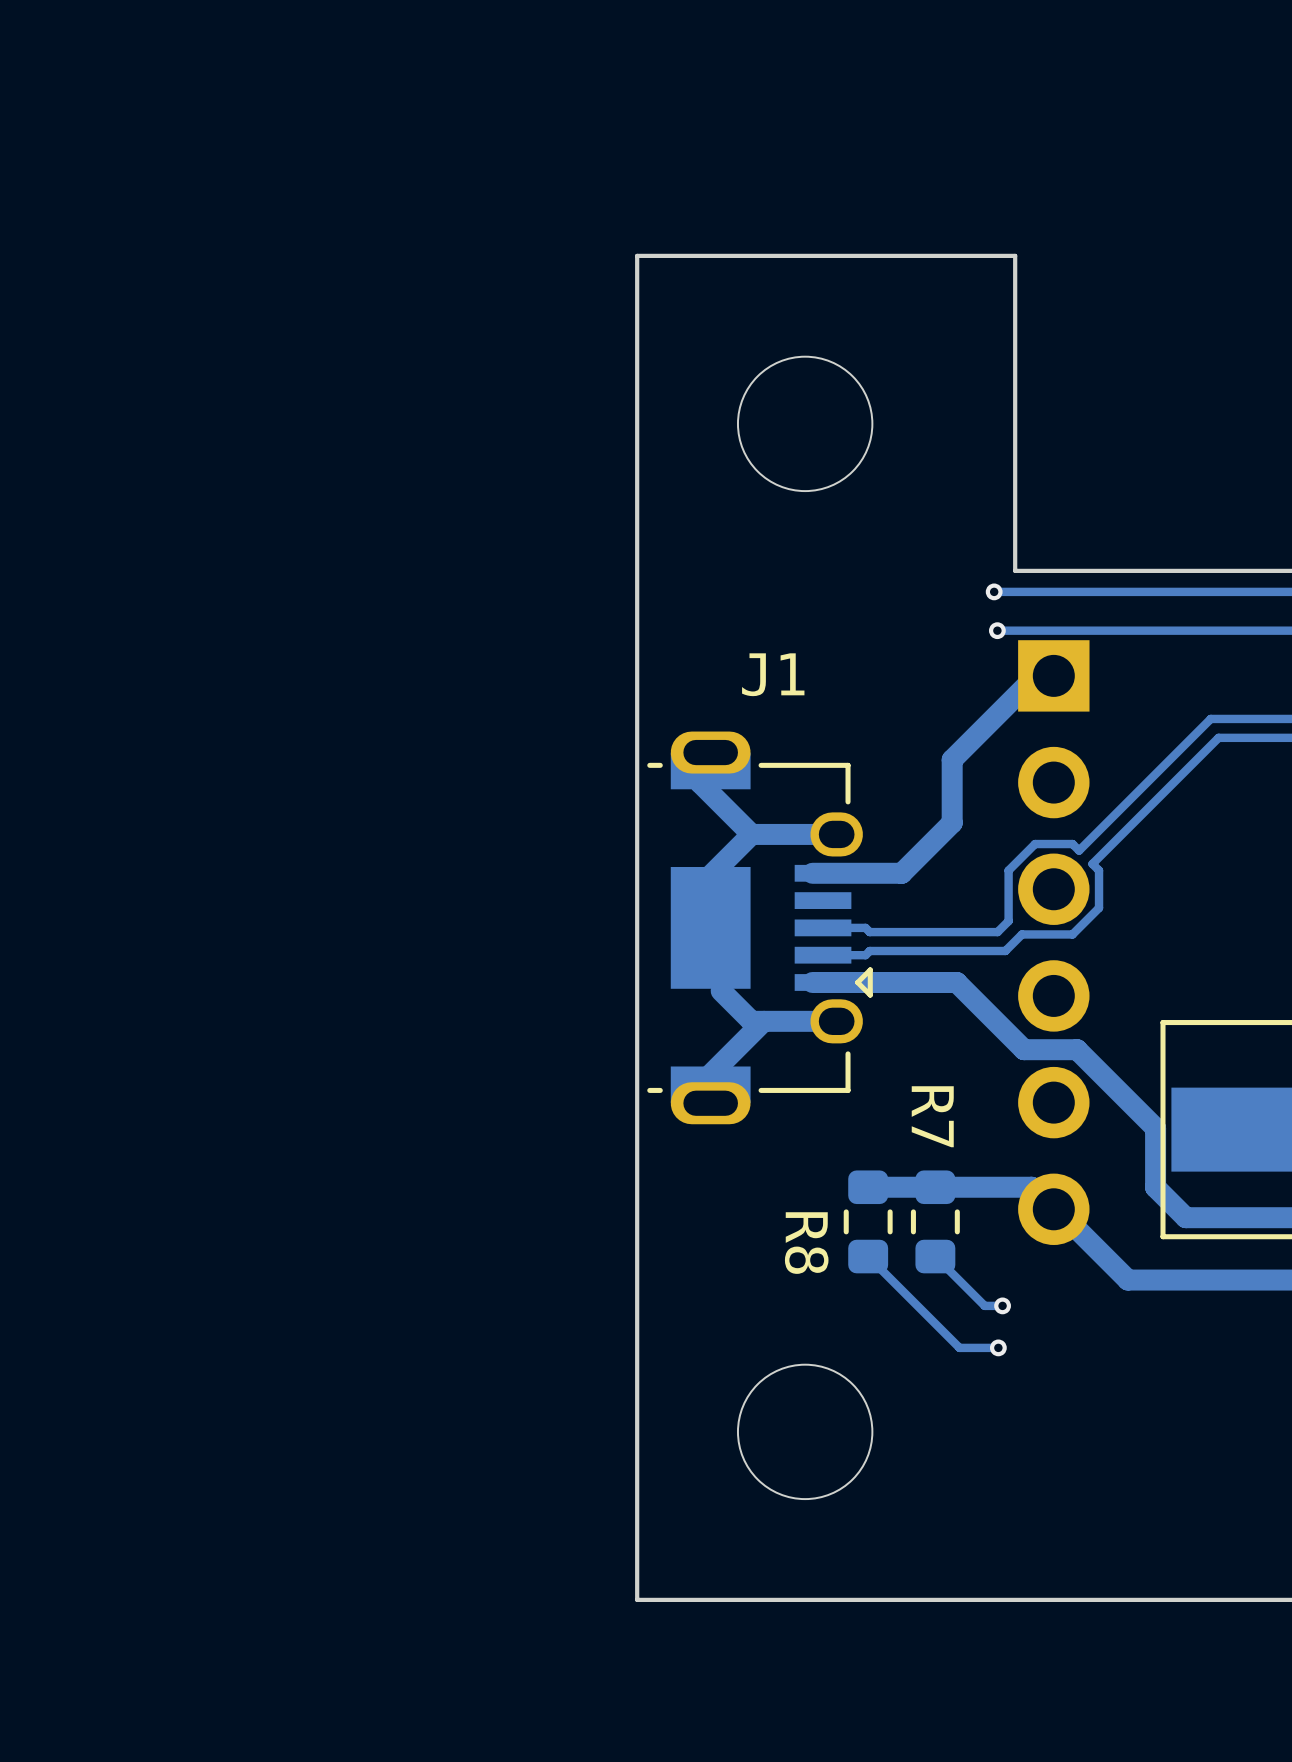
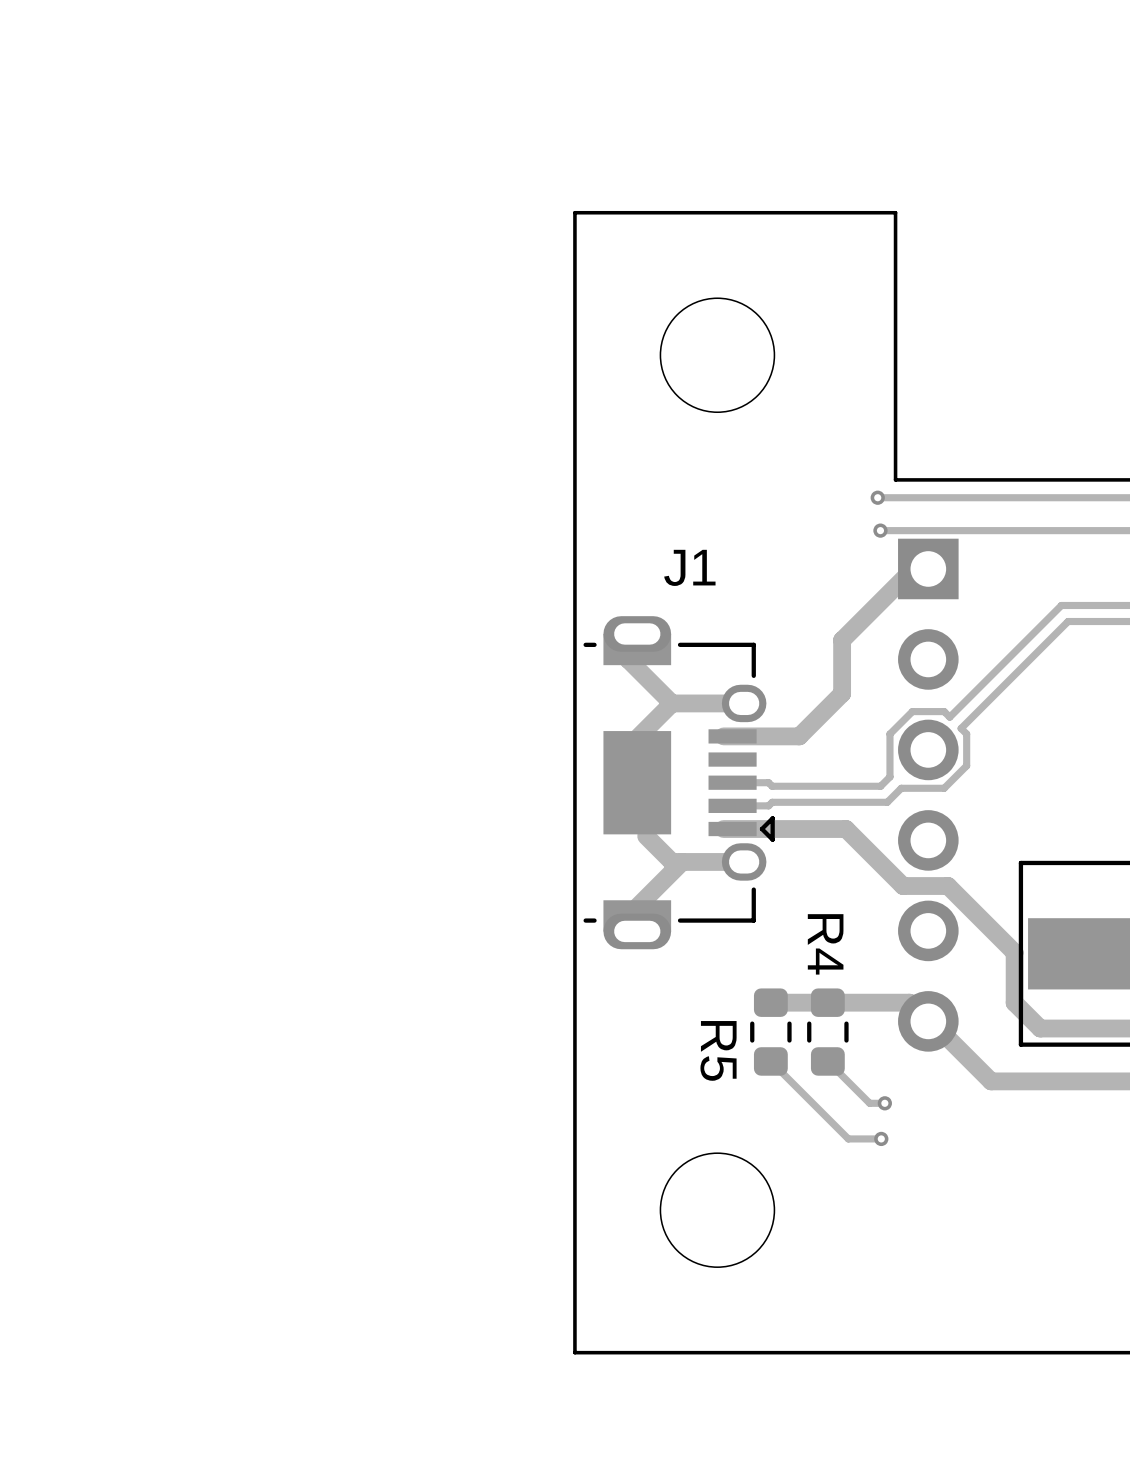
R7 name: R7 (932, 1116) -> R4 (825, 944)
R8 name: R8 (806, 1243) -> R5 (718, 1050)

